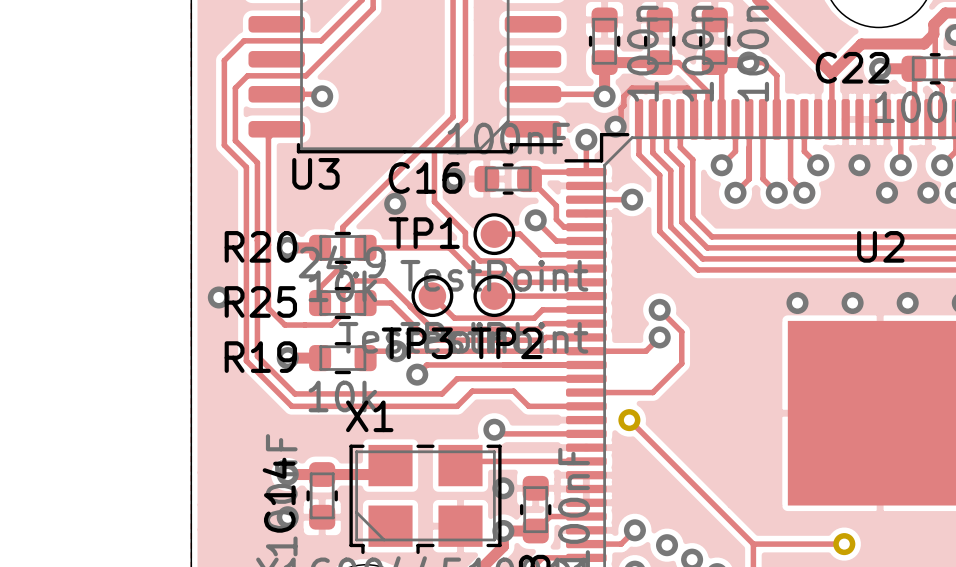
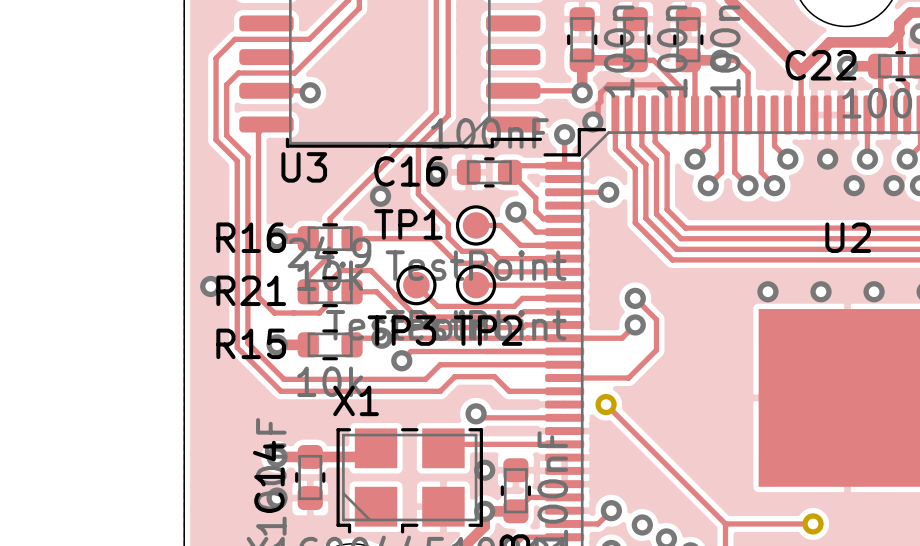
R20 name: R20 (260, 246) -> R16 (251, 237)
R25 name: R25 (260, 301) -> R21 (251, 290)
R19 name: R19 (260, 357) -> R15 (251, 343)

